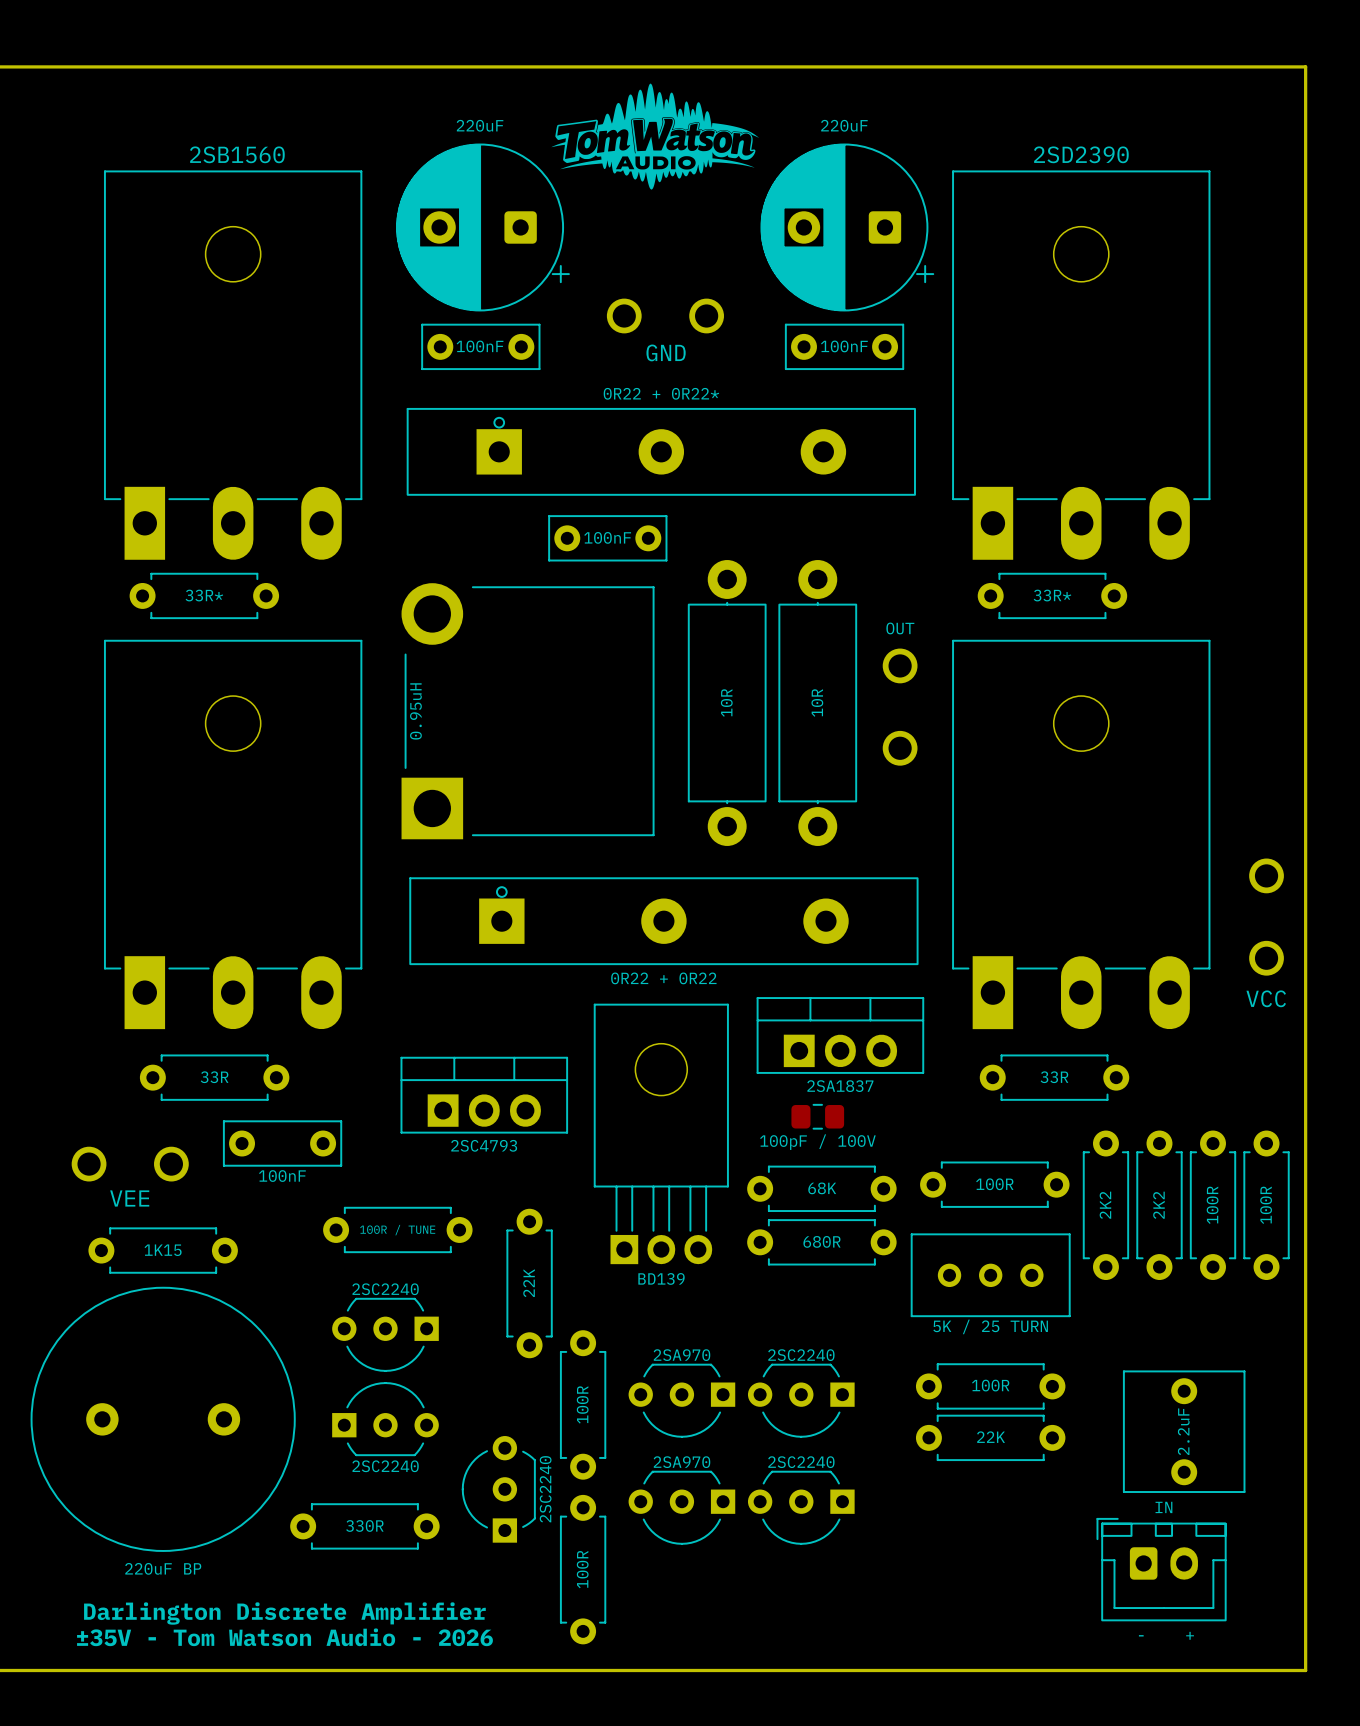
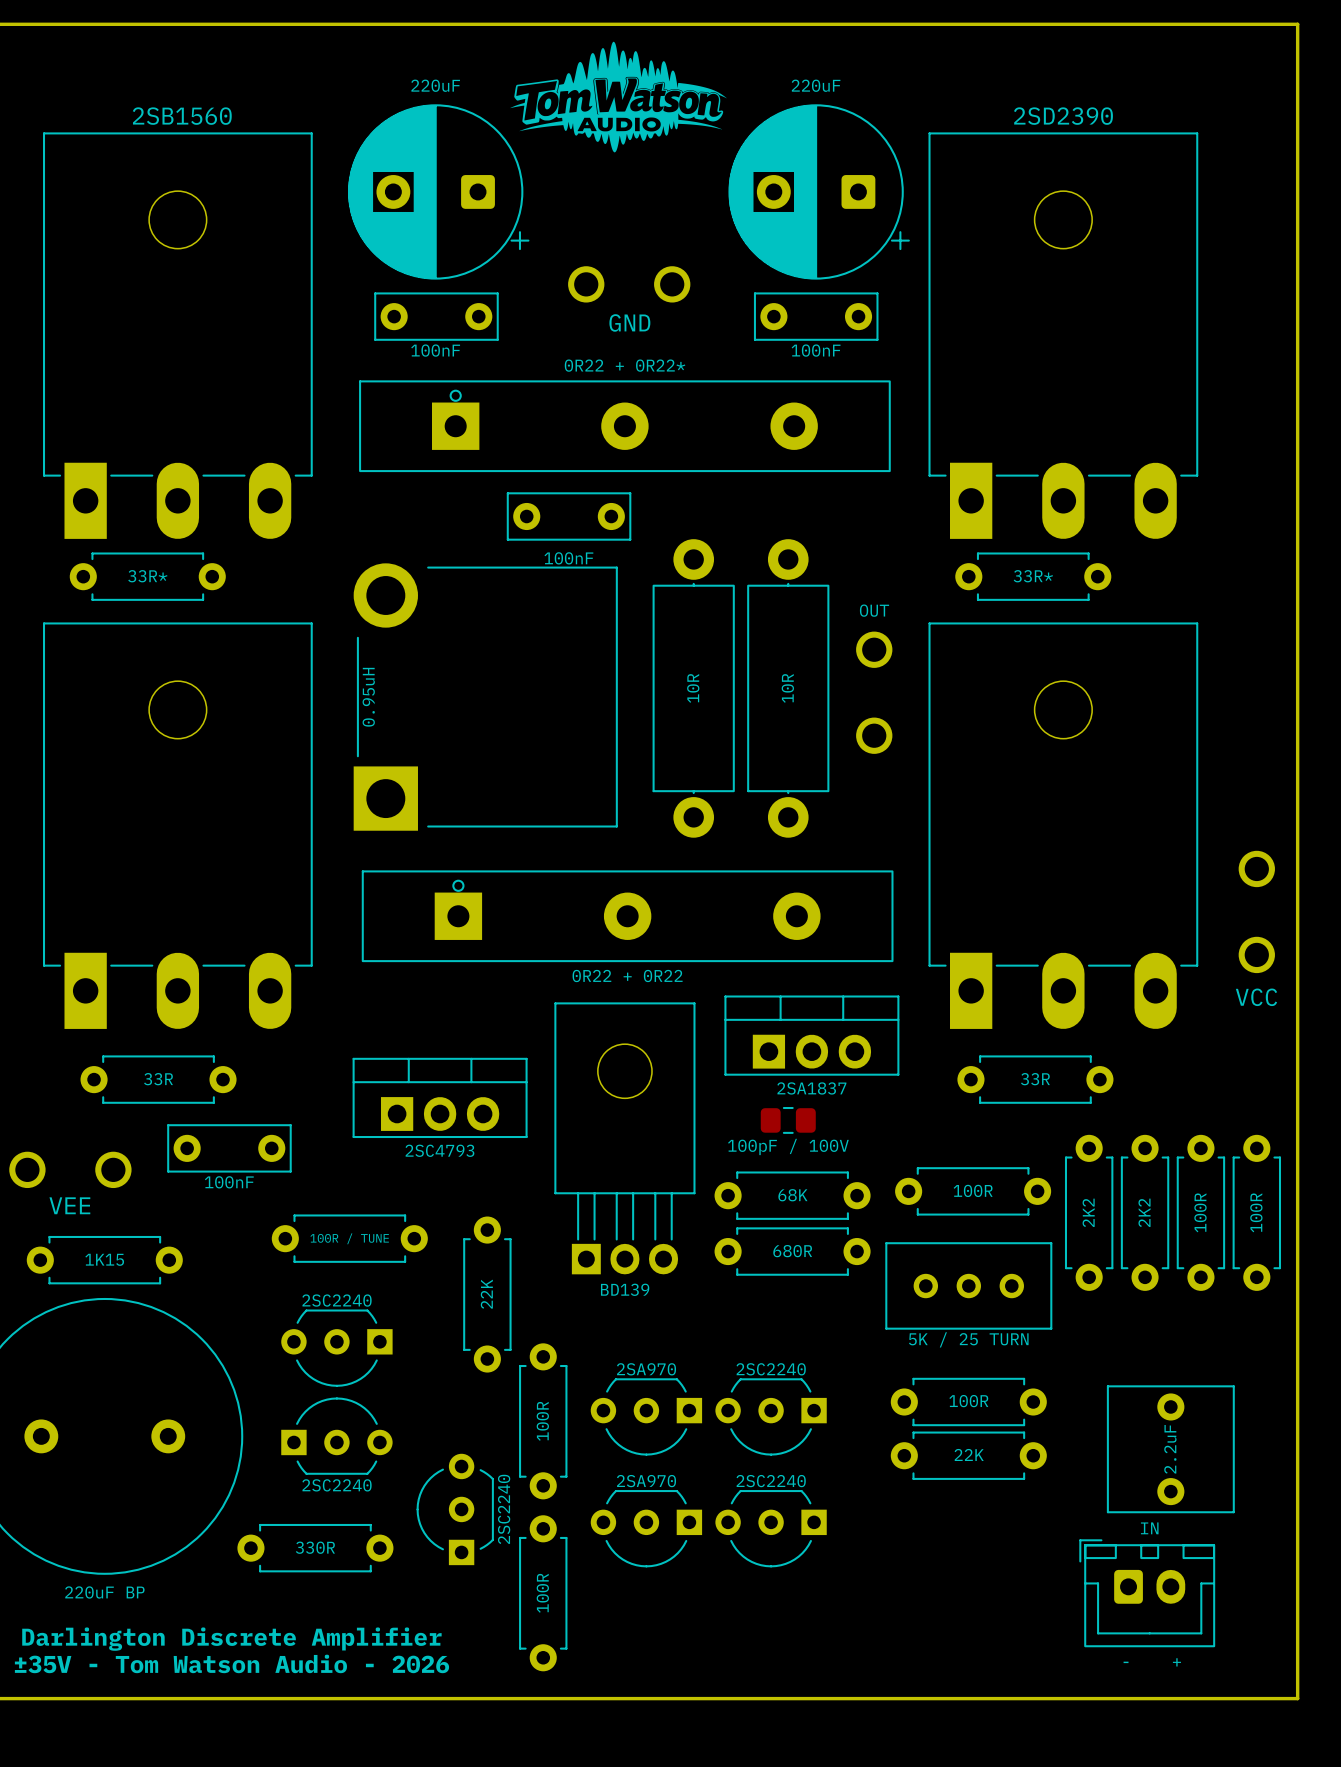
part value position: 100nF (480, 346) -> 100nF (435, 350)
part value position: 100nF (844, 346) -> 100nF (816, 350)
part value position: 100nF (607, 537) -> 100nF (568, 558)

